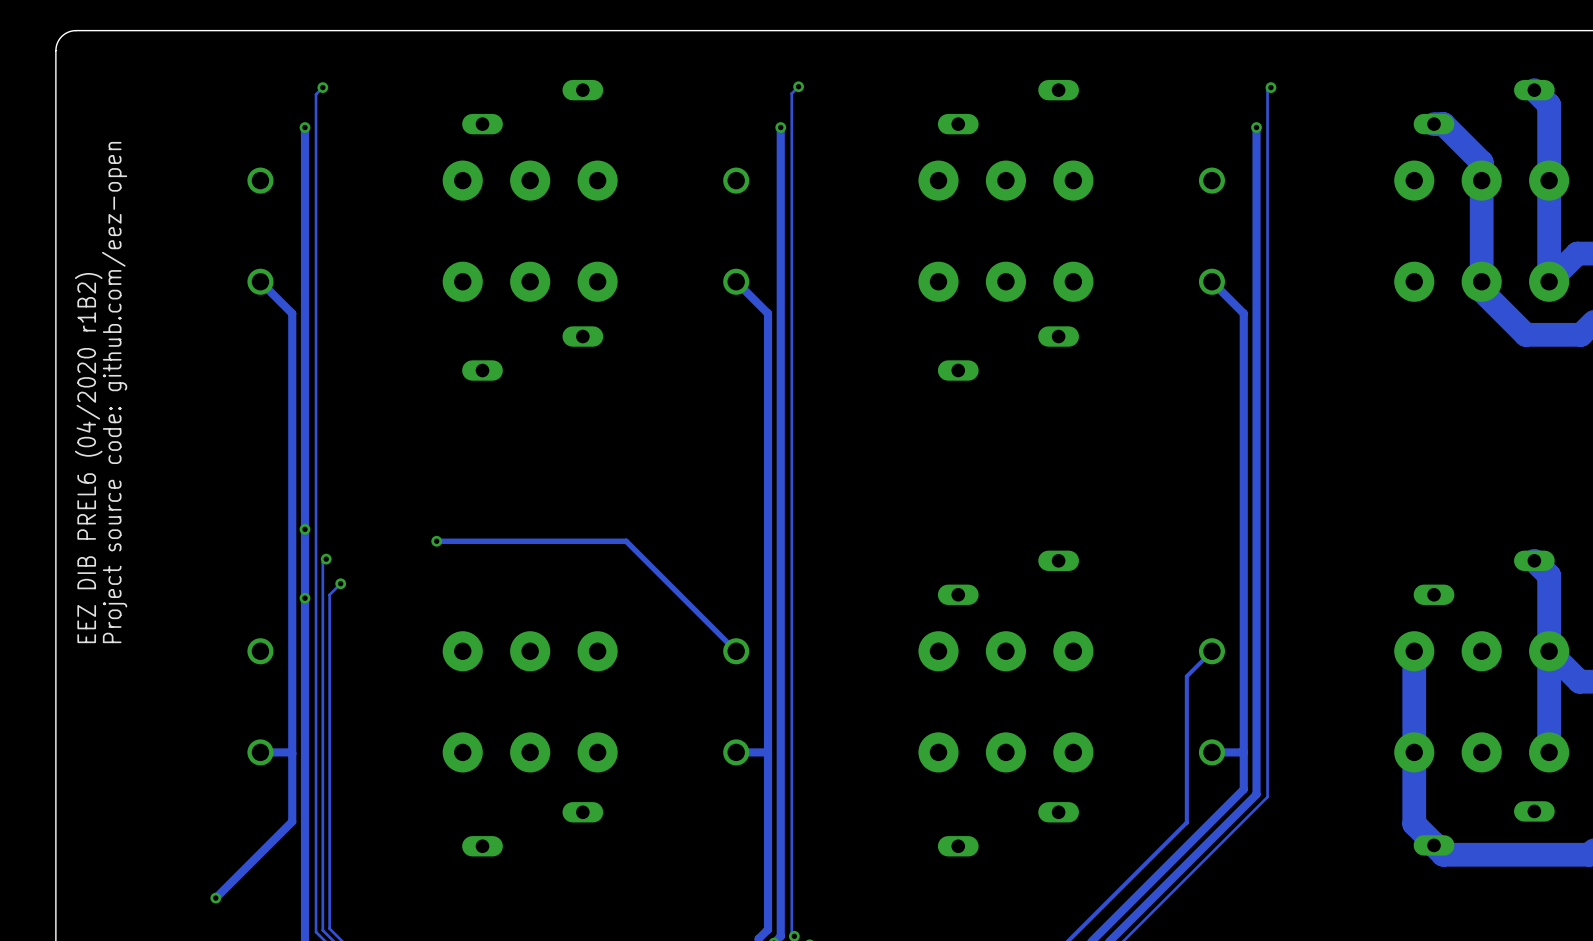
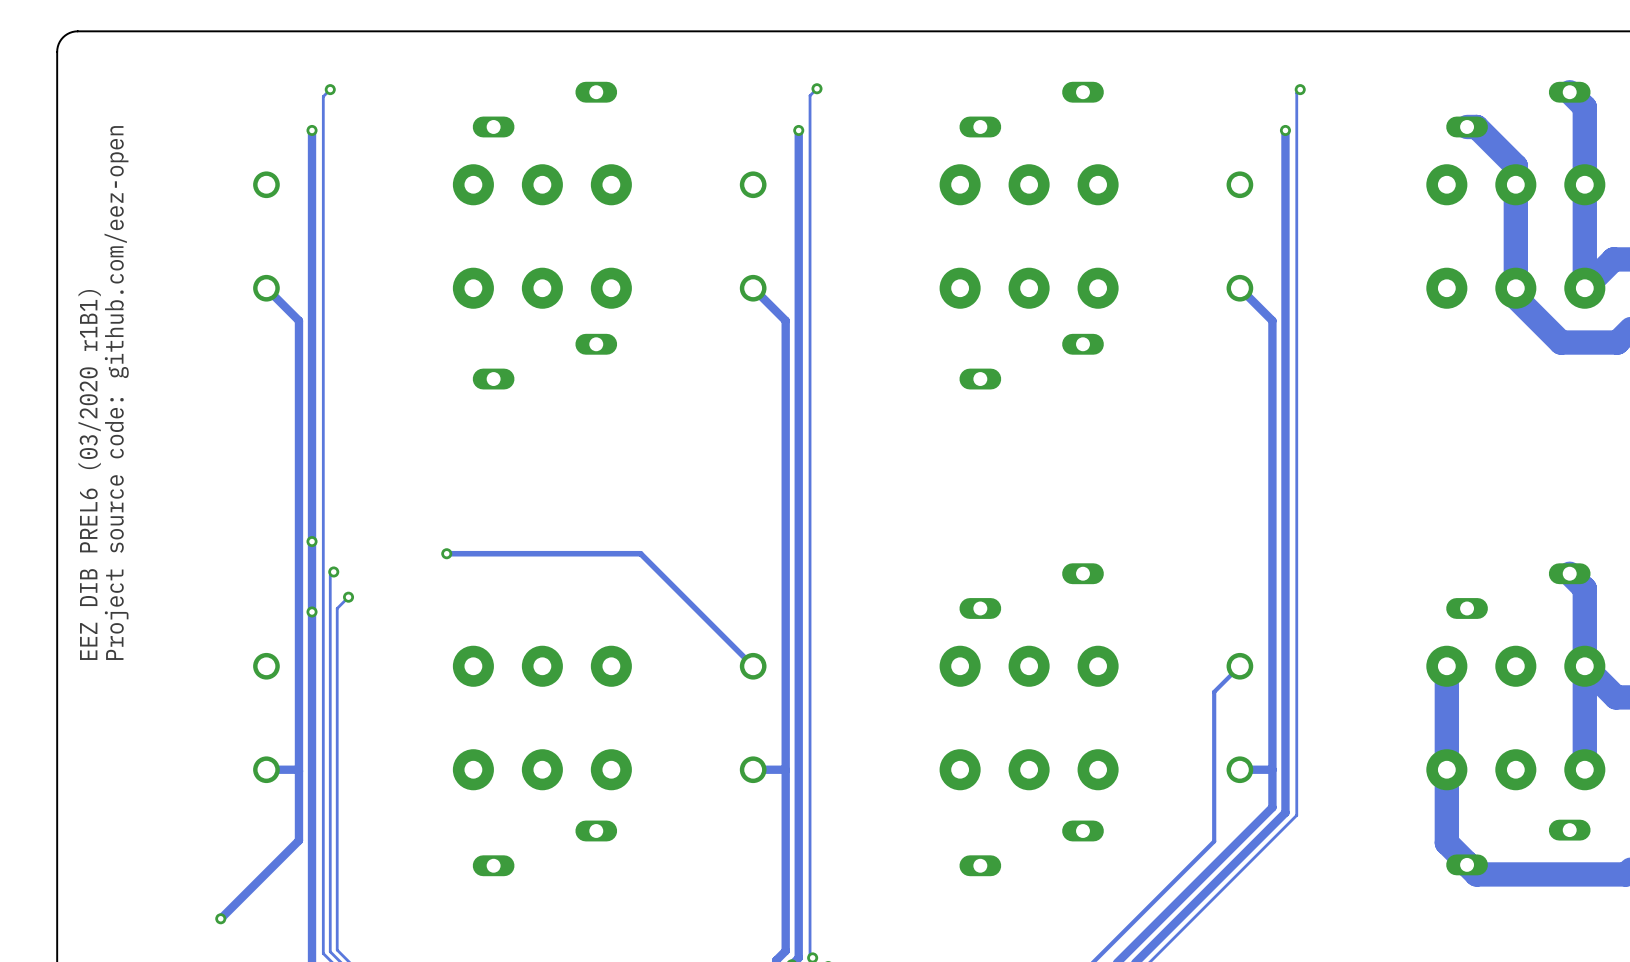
text: EEZ DIB PREL6 (04/2020 r1B2) (88, 458) -> EEZ DIB PREL6 (03/2020 r1B1) (89, 474)

